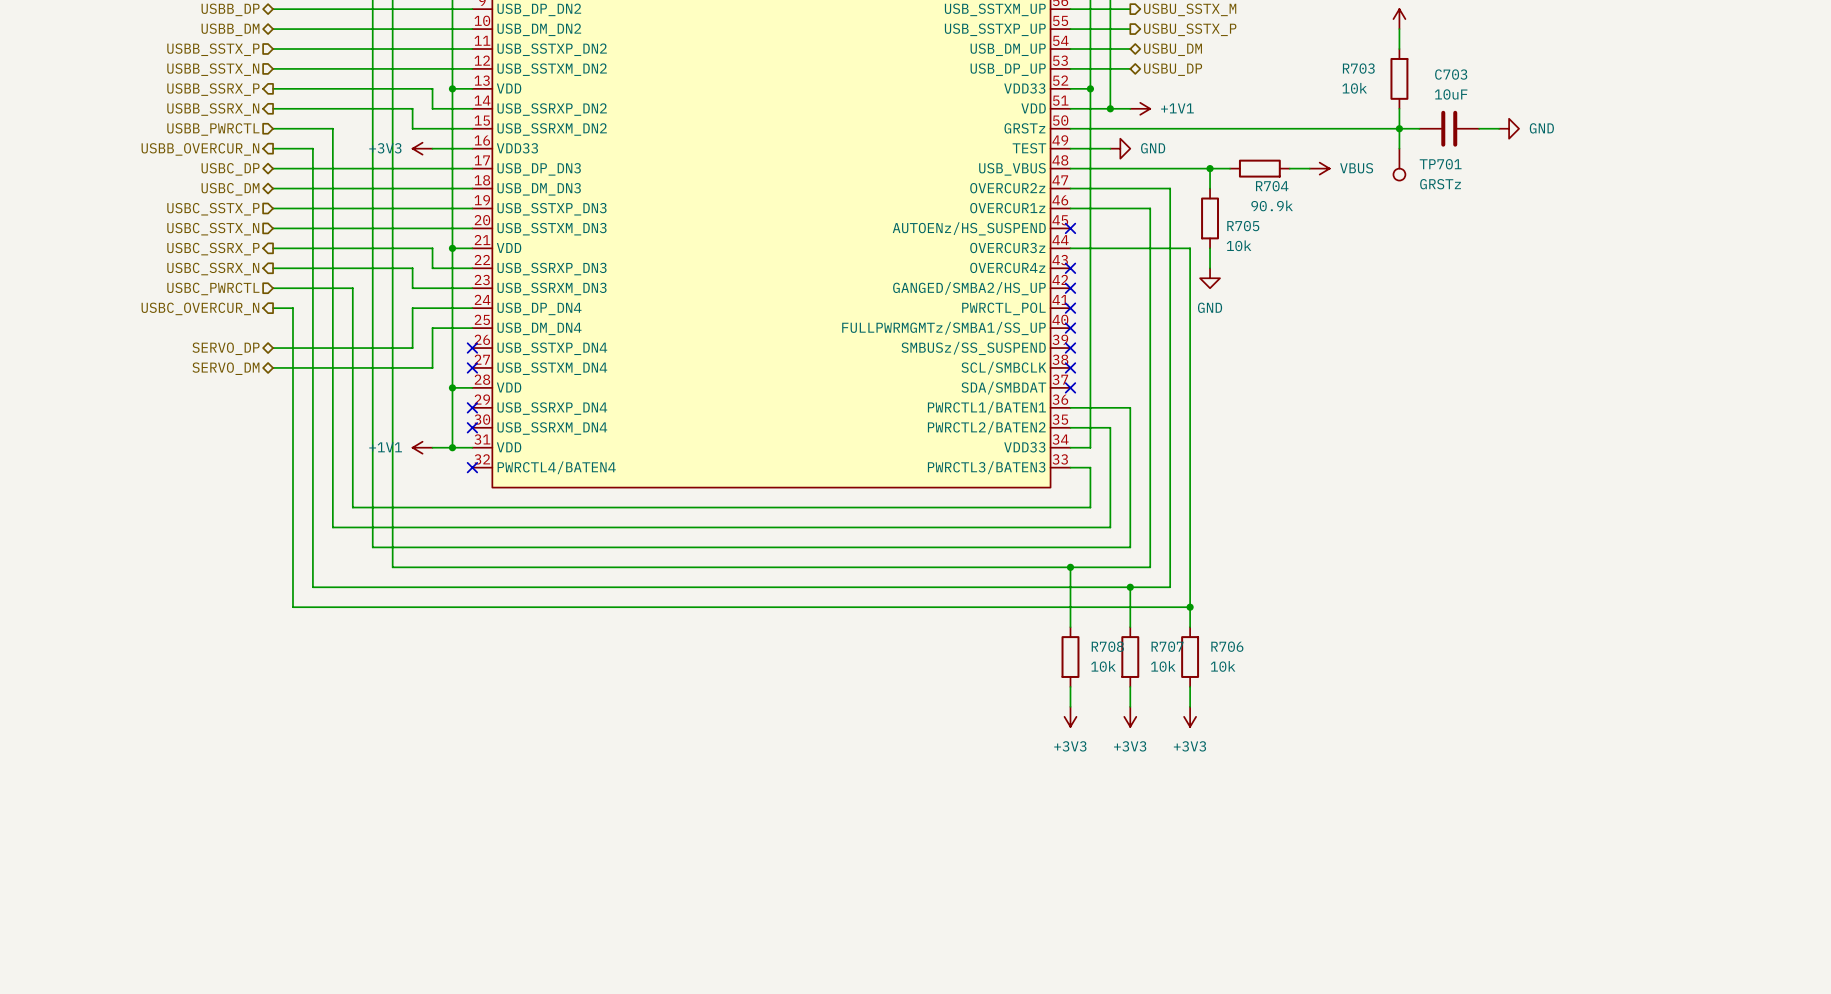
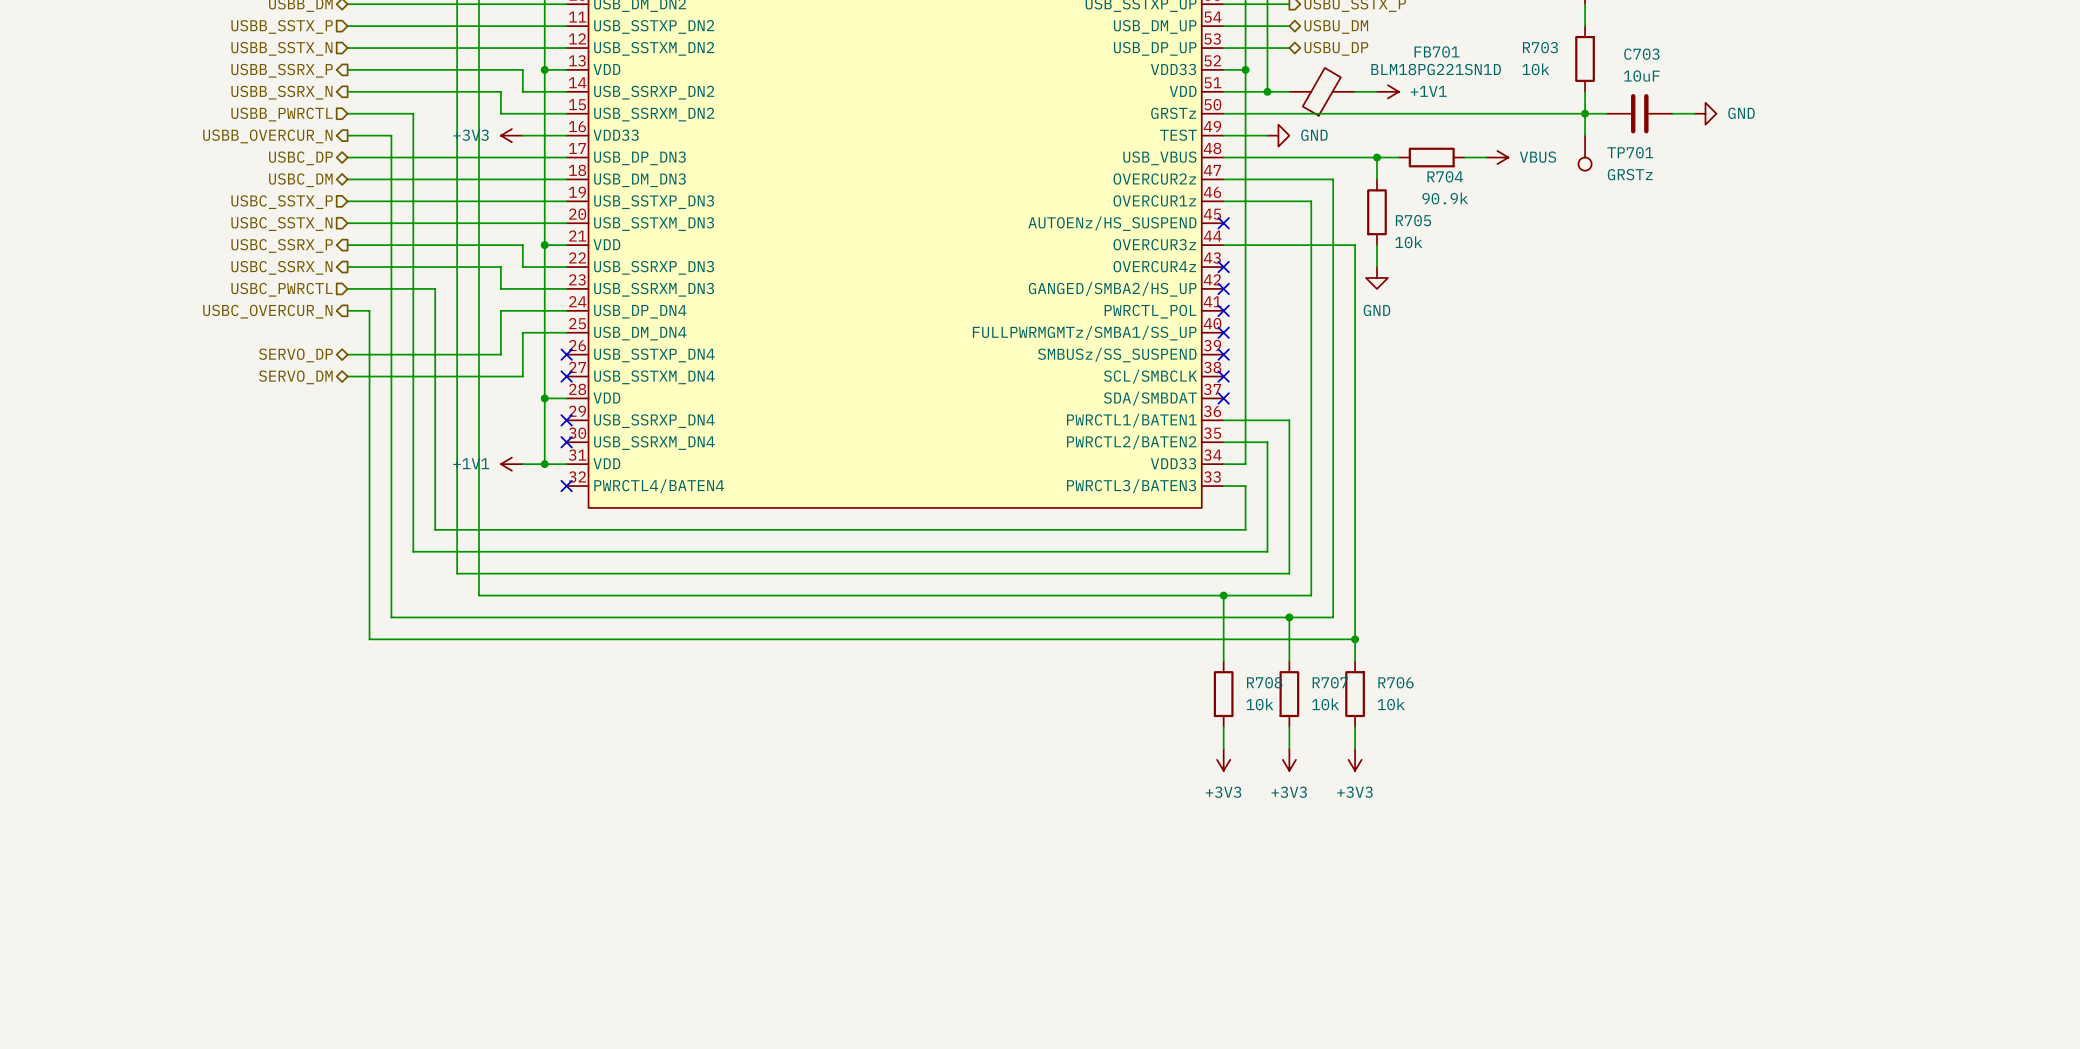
power symbol position: +1V1 (1140, 108) -> +1V1 (1387, 91)
FB701: none -> BLM18PG221SN1D (1322, 91)
wire: none -> (1355, 91) (1376, 91)

